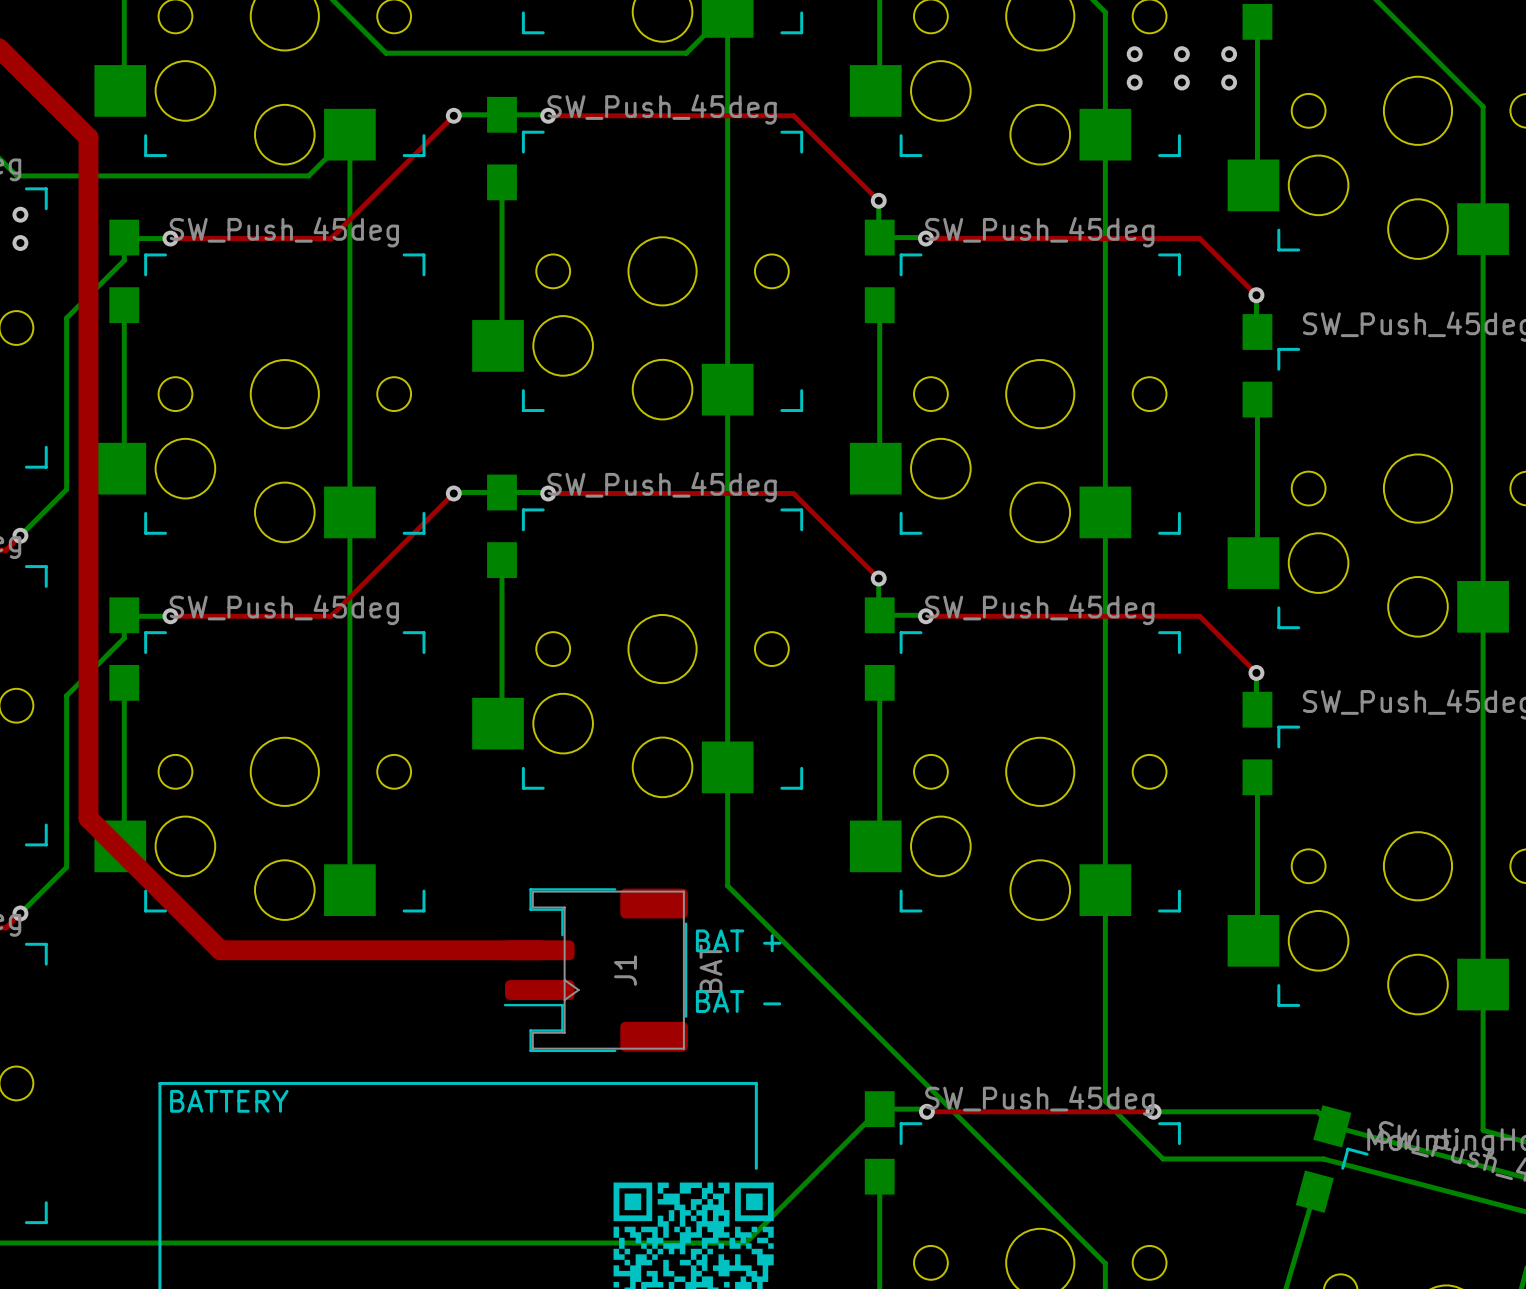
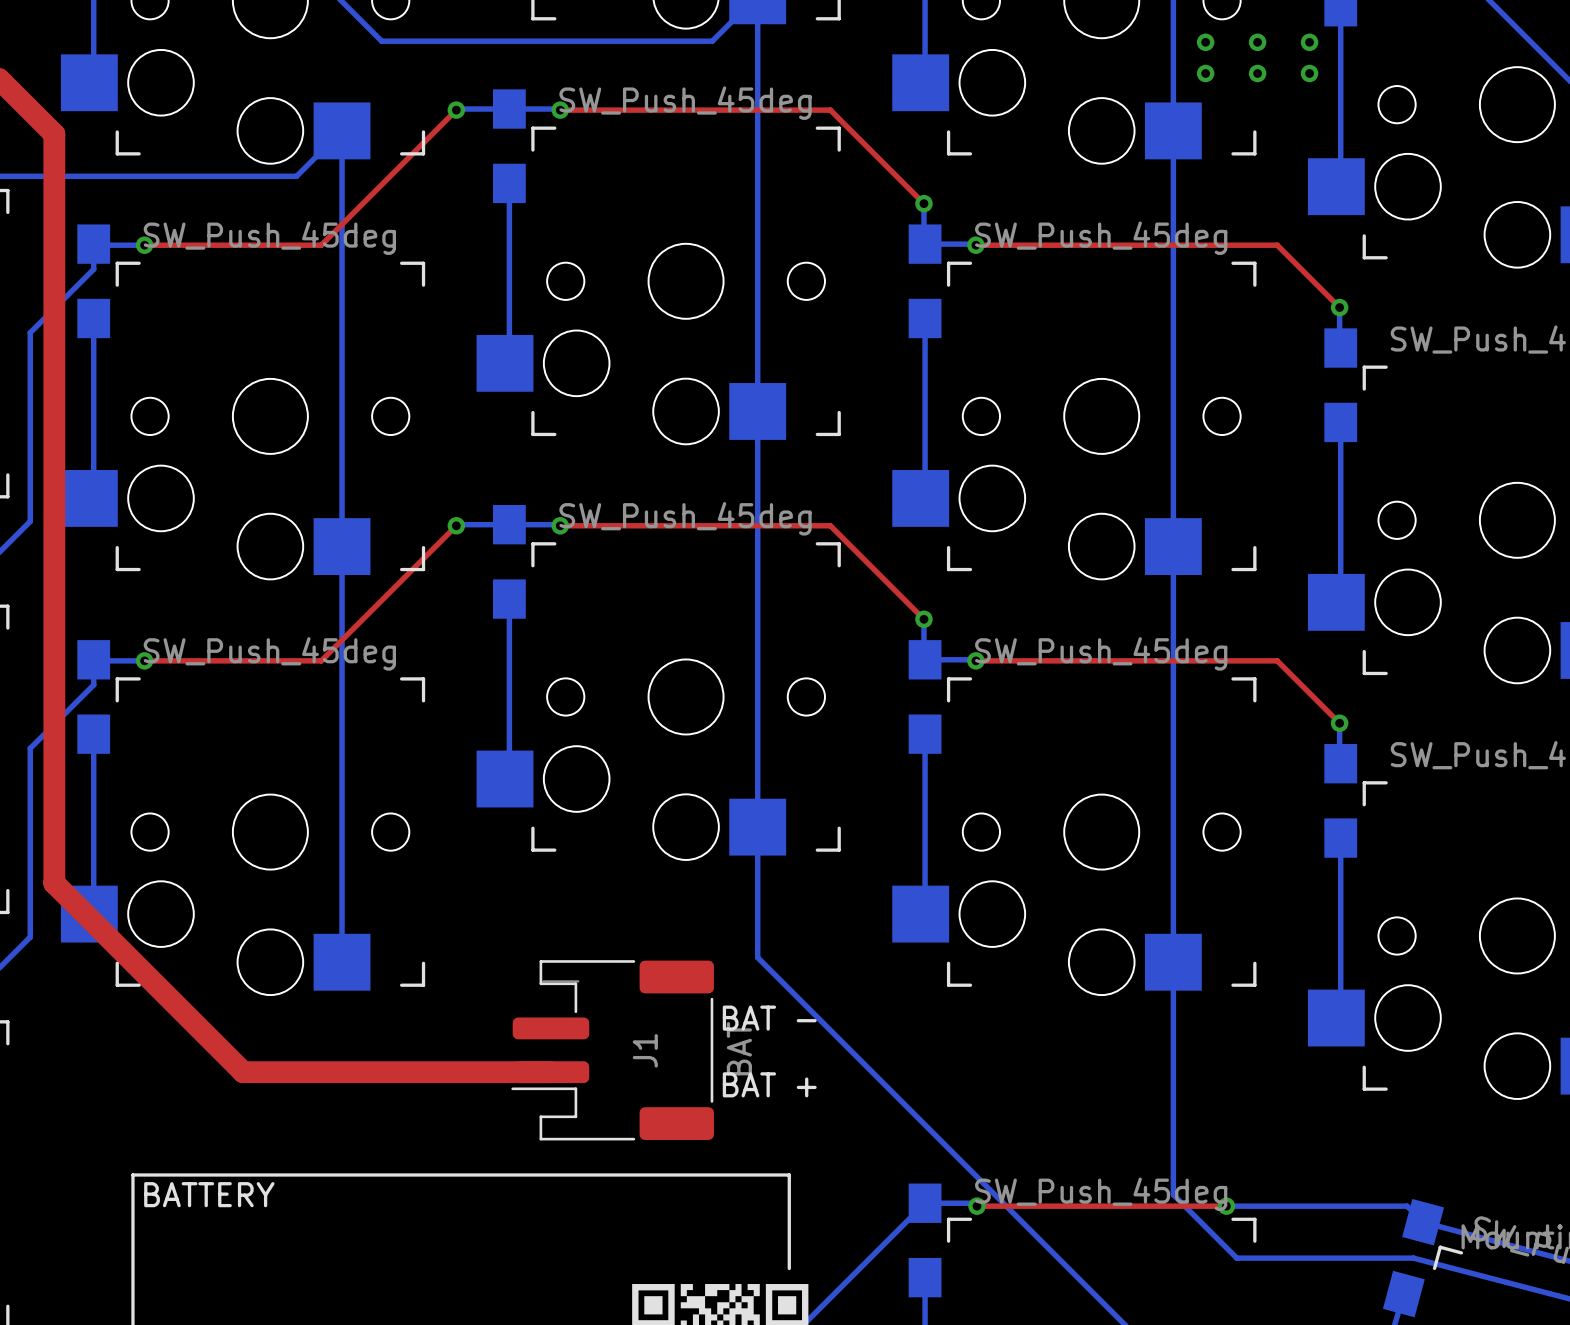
J1 footprint: [503, 888, 688, 1053] -> [511, 960, 714, 1141]
text: BAT + (738, 940) -> BAT - (769, 1018)
top track: (220, 950) (539, 950) -> (199, 1028) (243, 1072) (550, 1072)
text: BAT - (738, 1001) -> BAT + (769, 1084)

